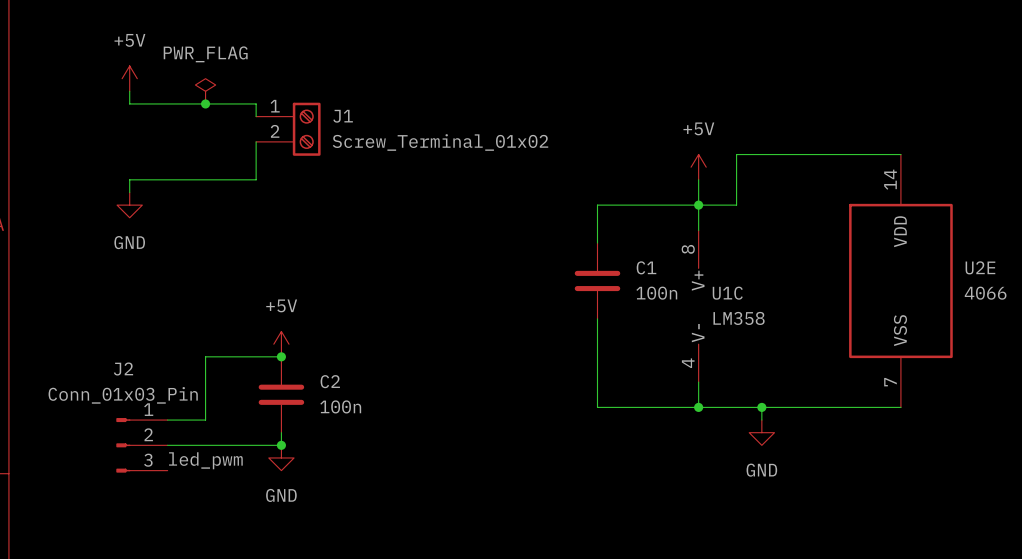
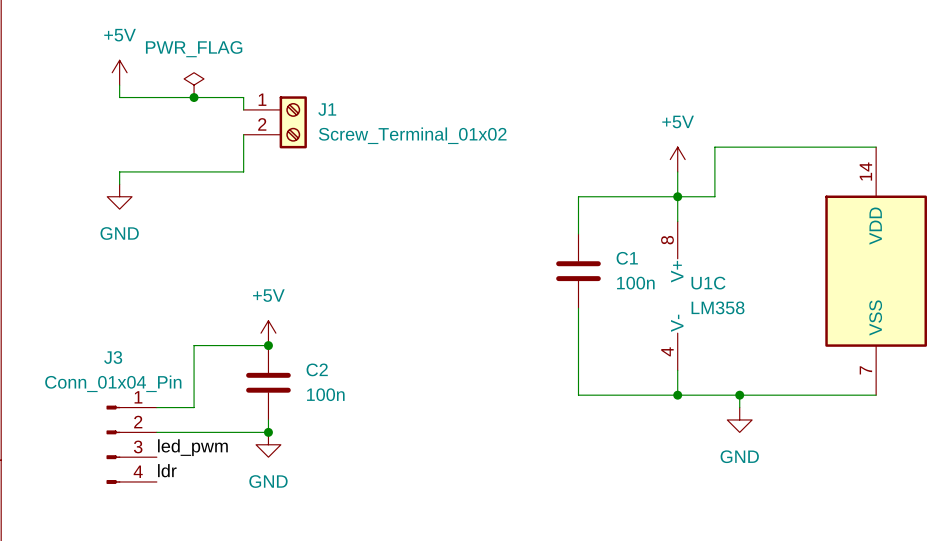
J2: Conn_01x03_Pin (141, 445) -> none
J3: none -> Conn_01x04_Pin (131, 444)
label: none -> ldr (167, 470)

